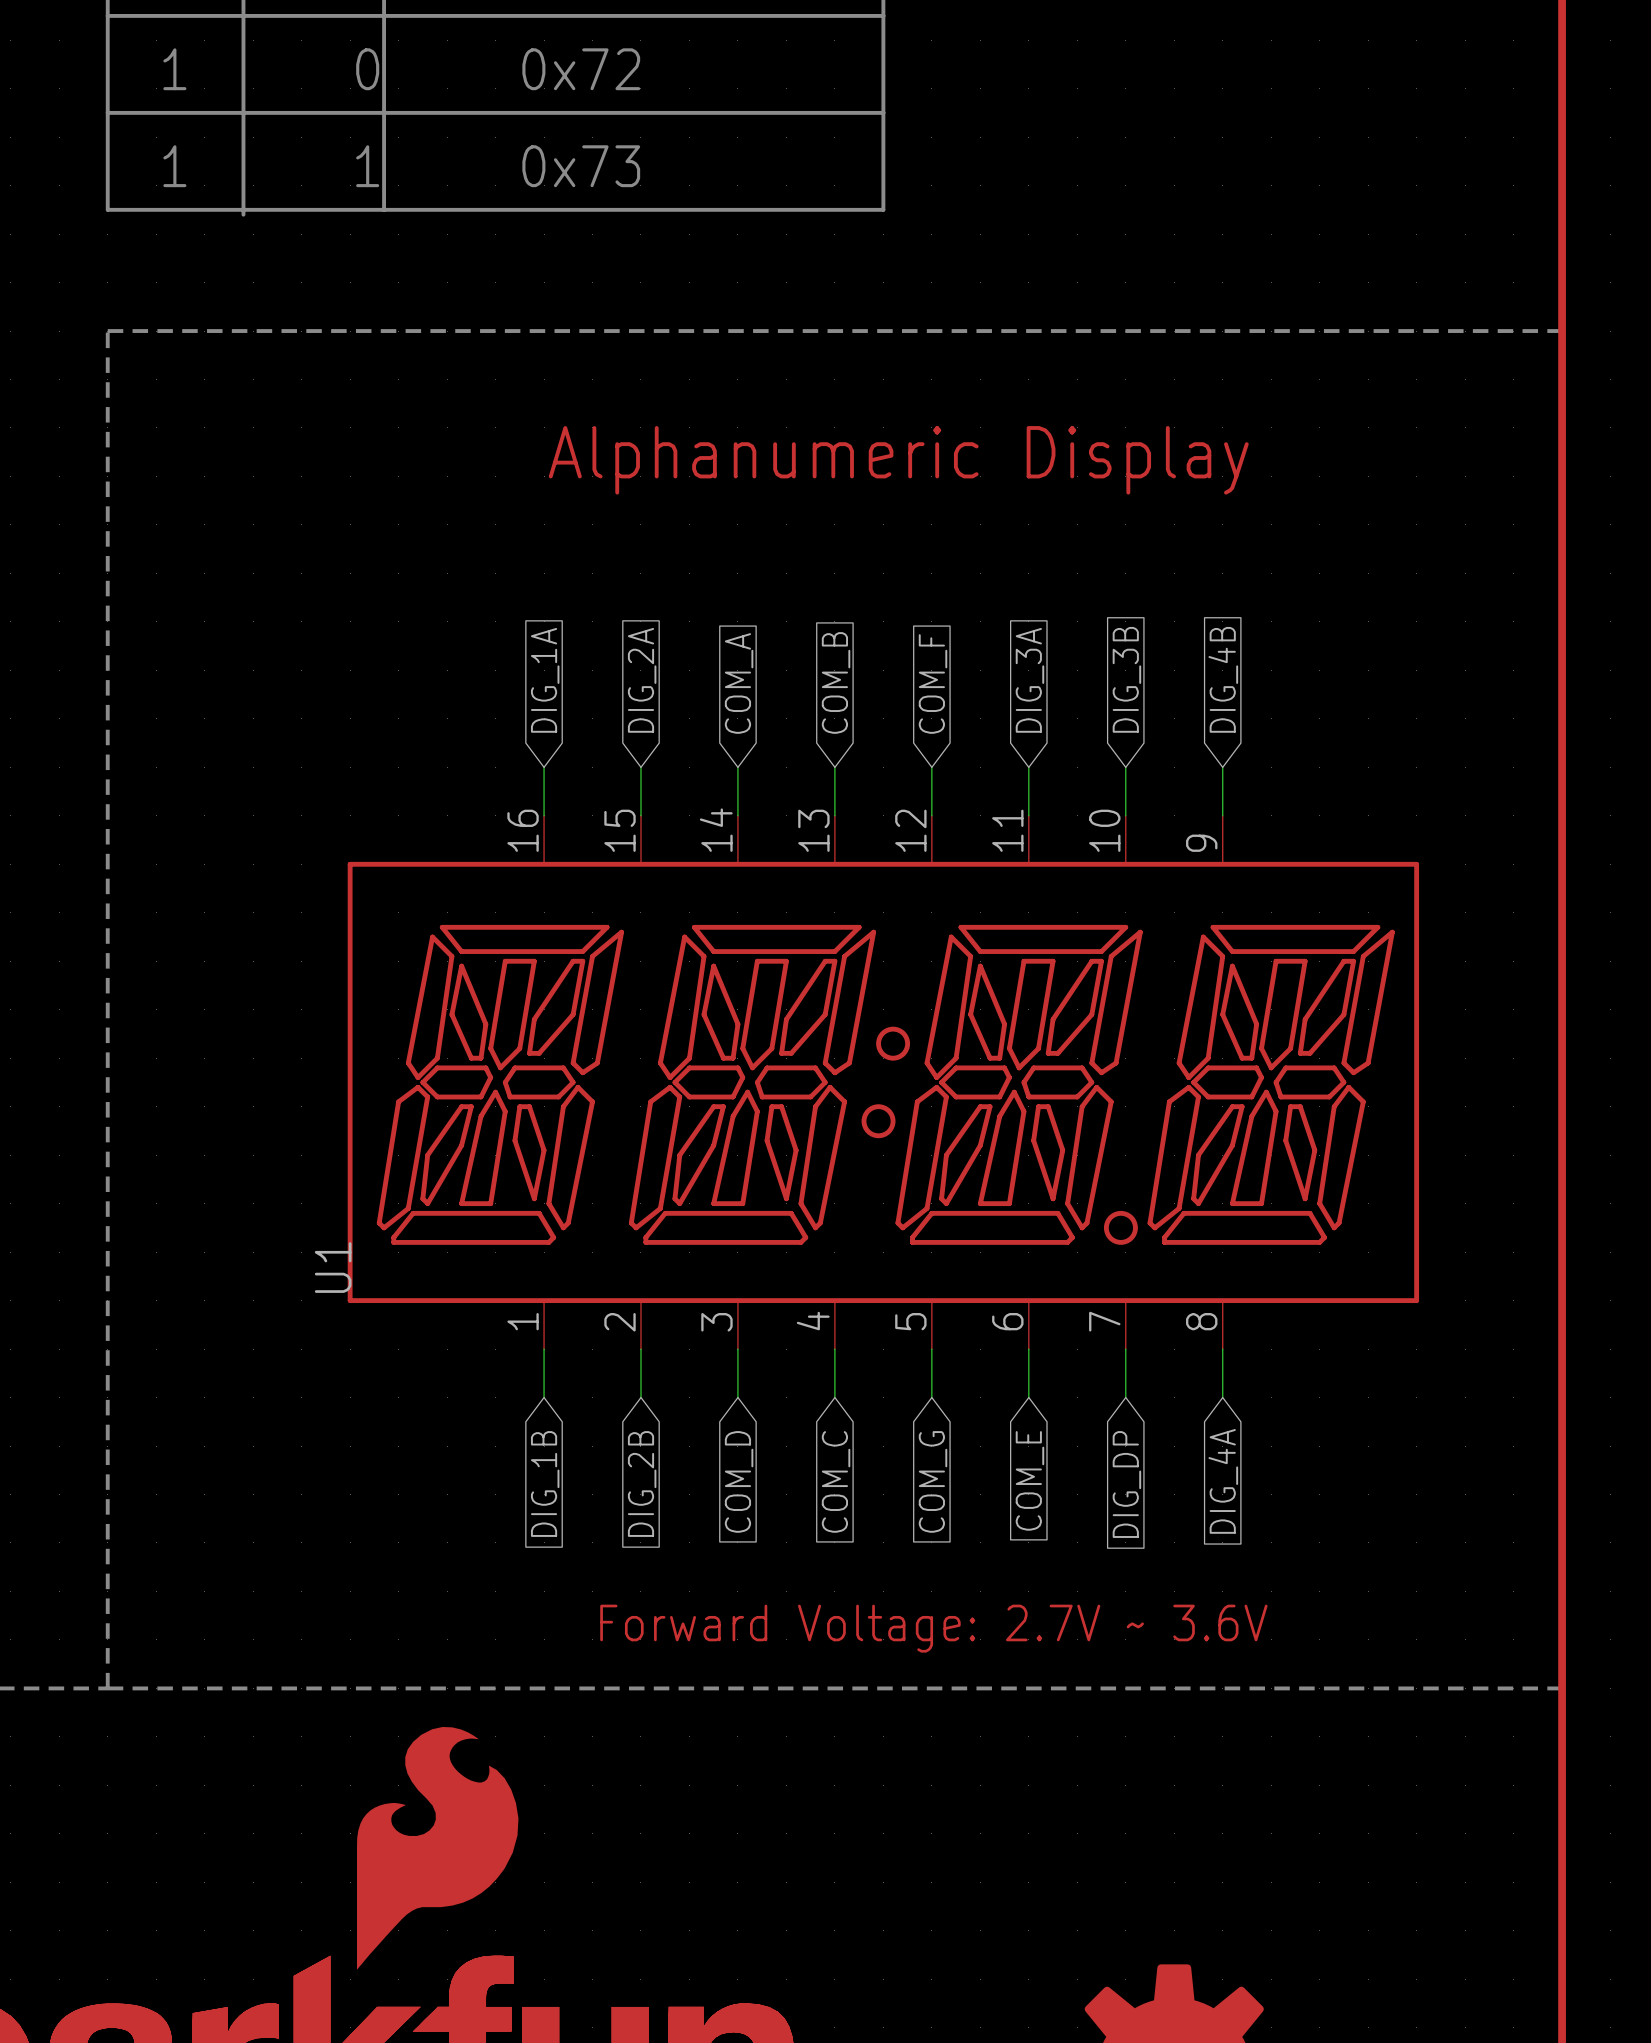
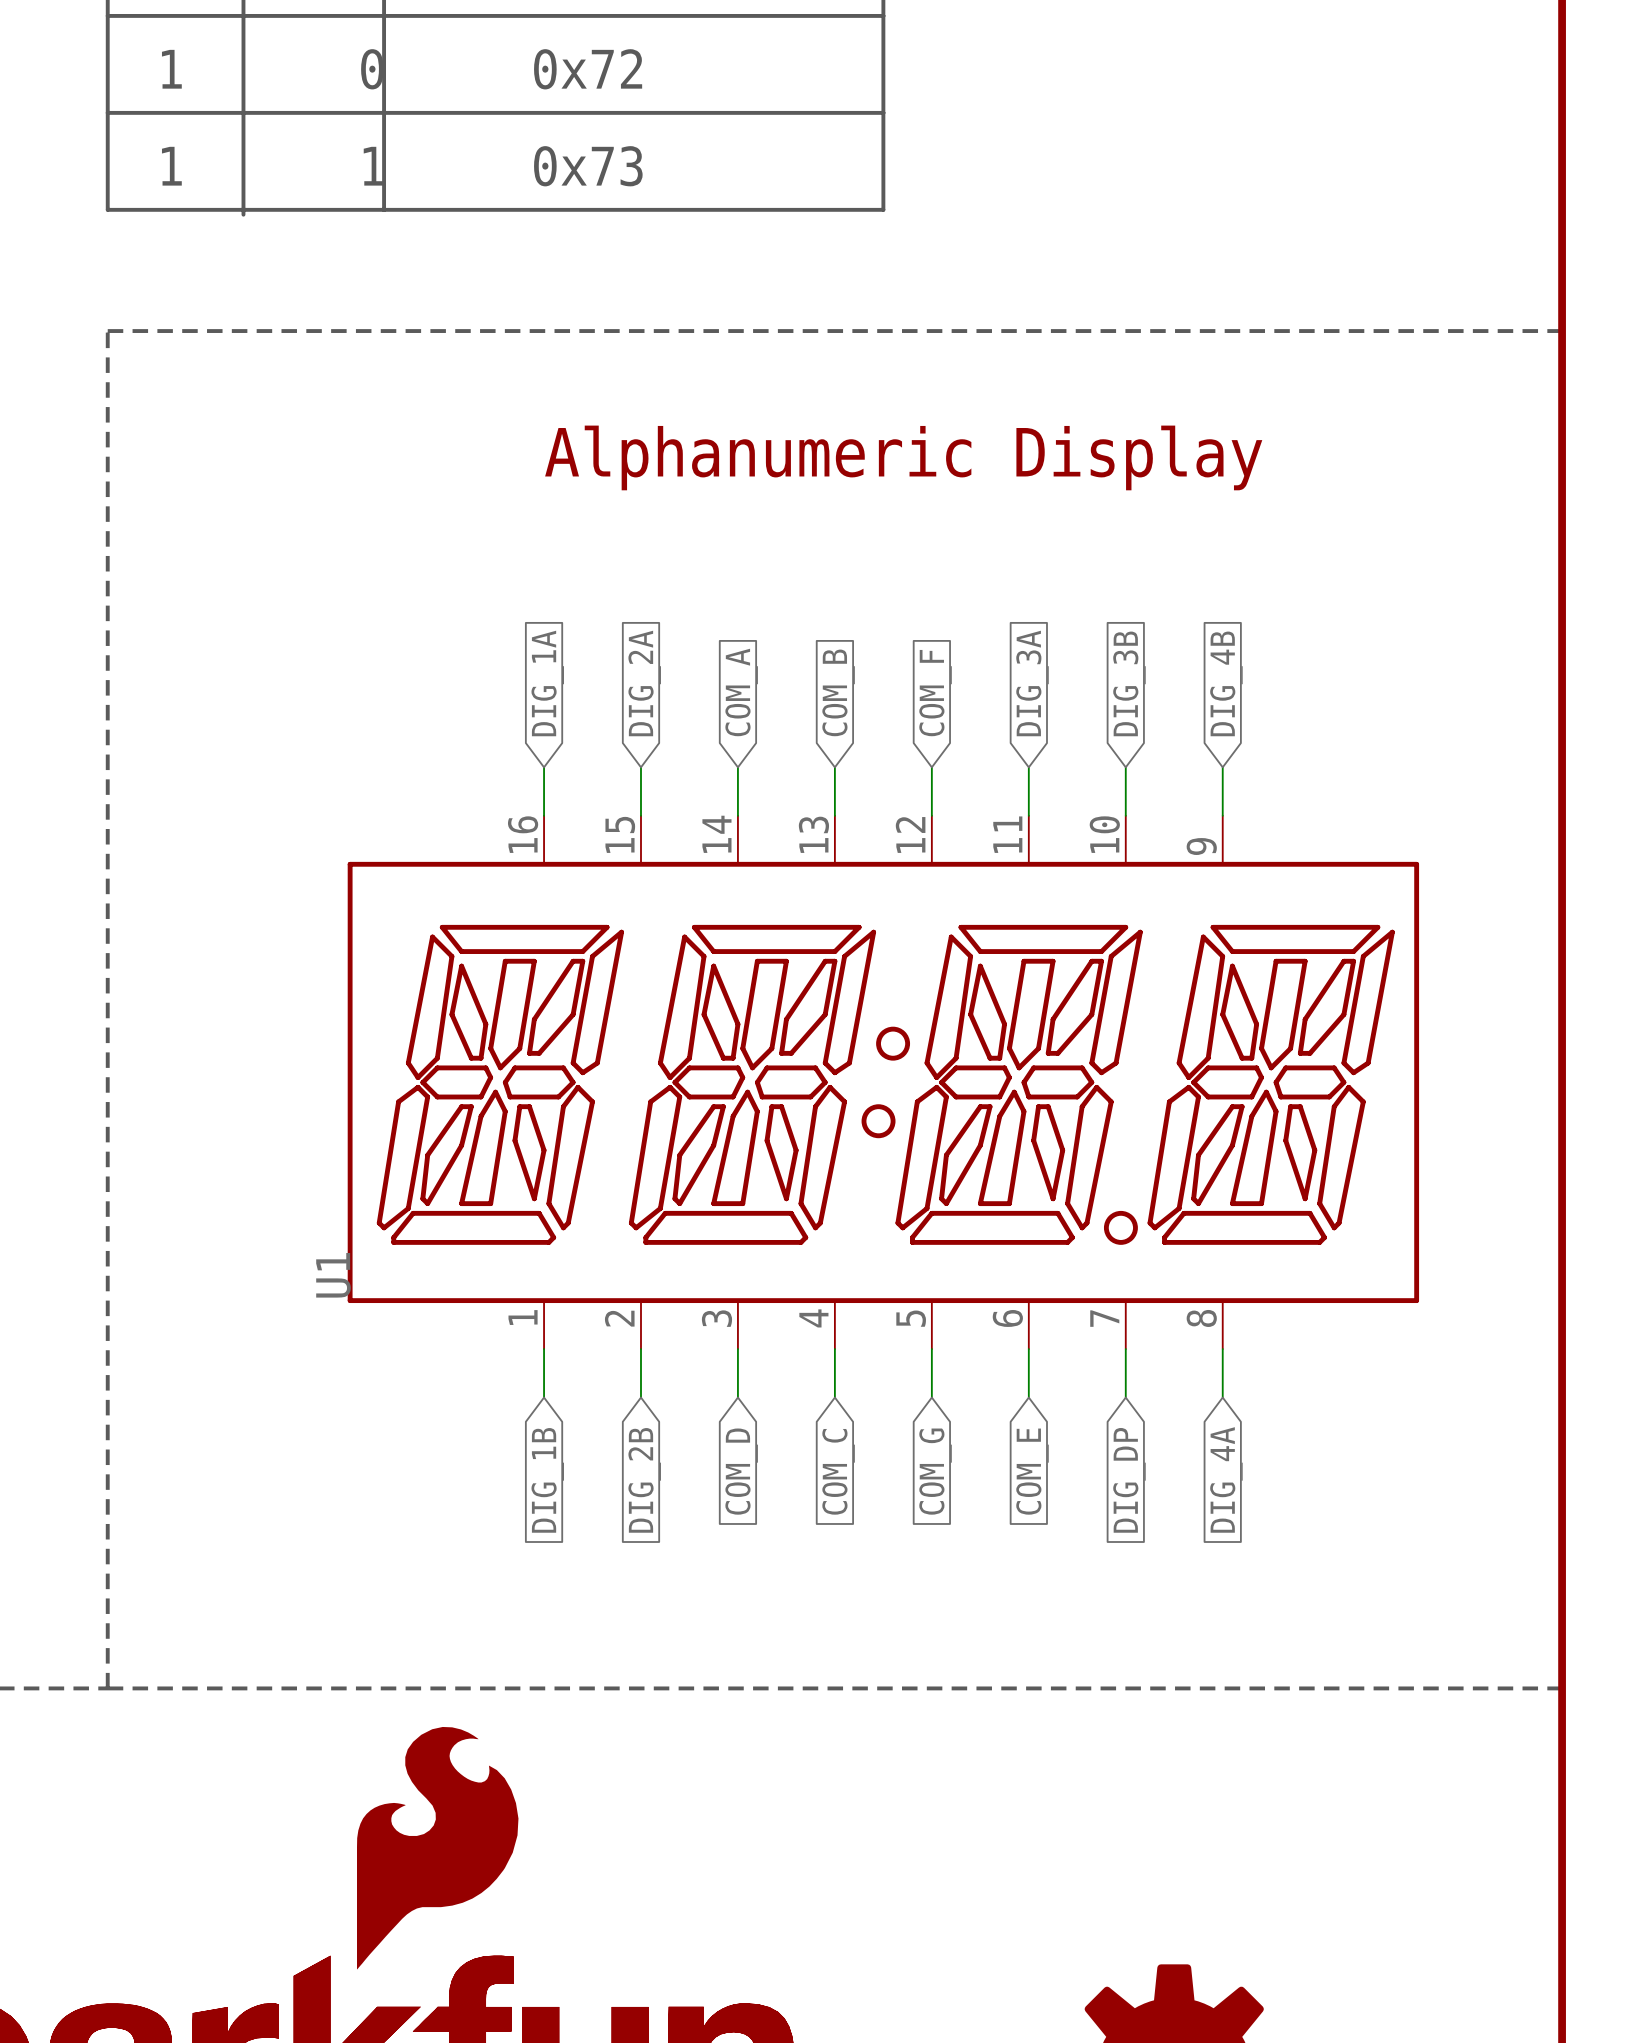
text: Forward Voltage: 2.7V ~ 3.6V (933, 1628) -> none

